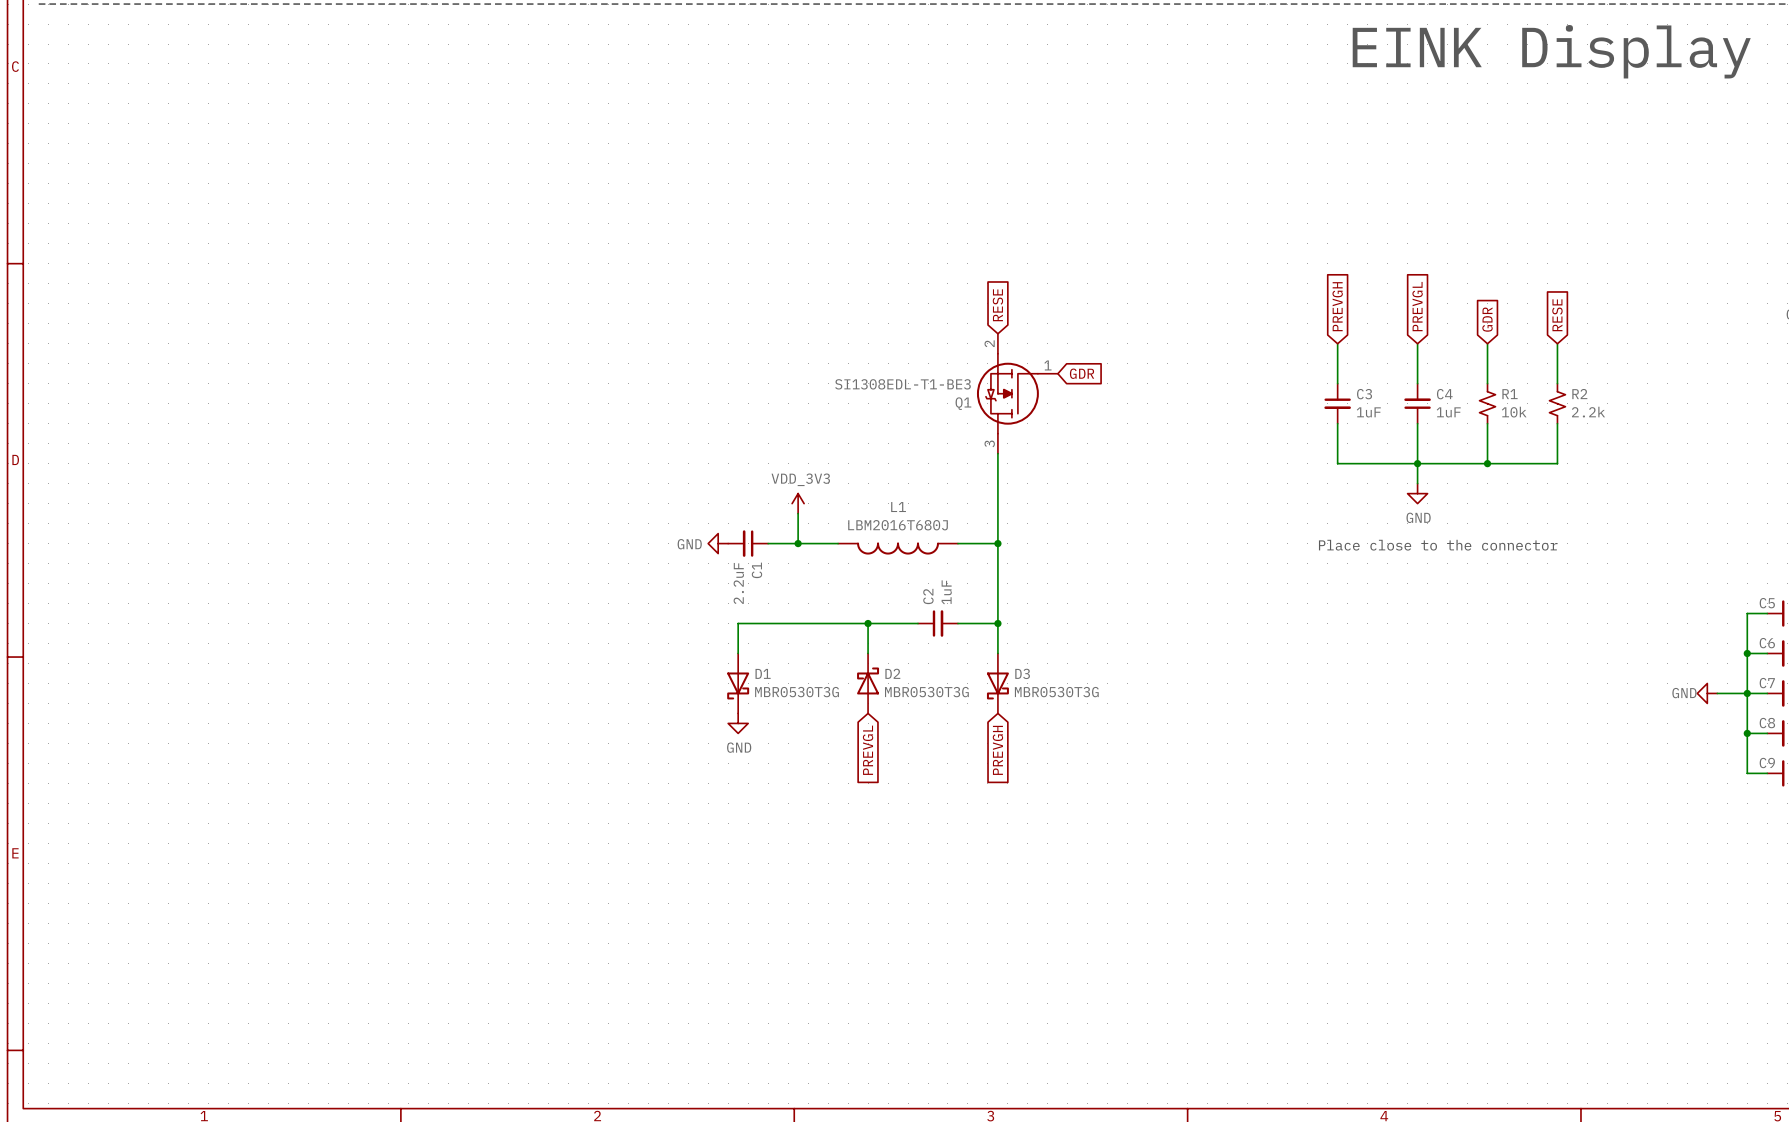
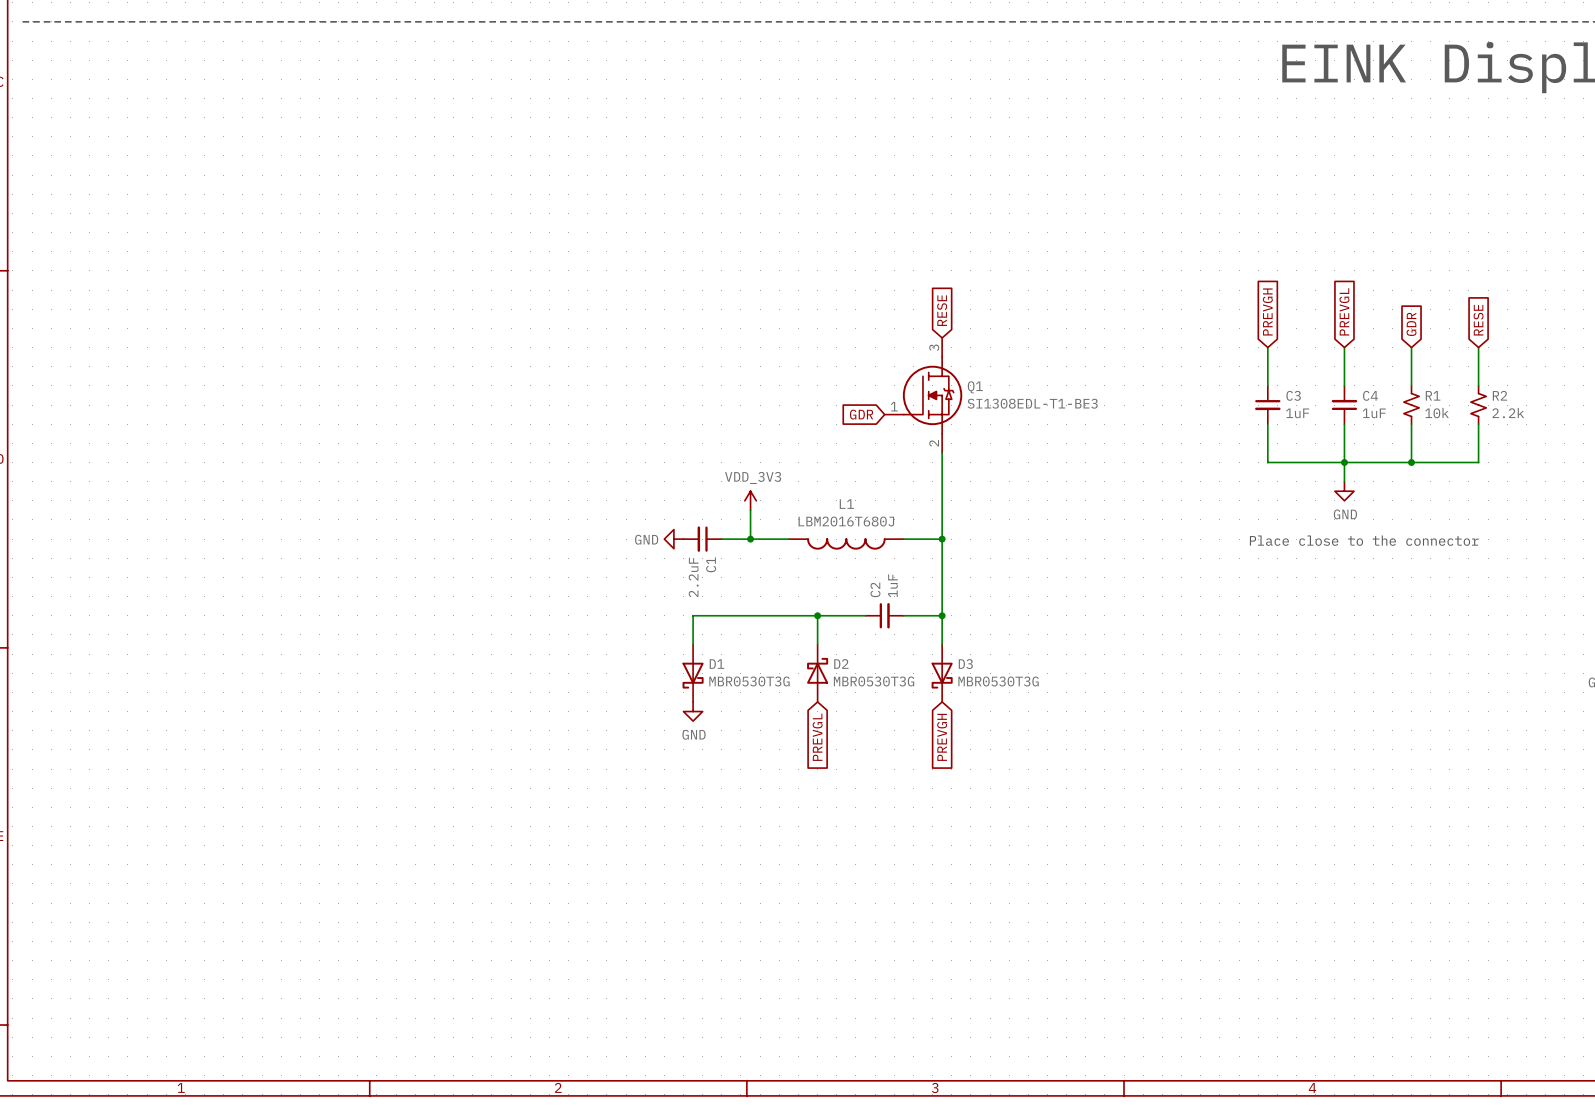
global label rotation: 0° (1082, 373) -> 180° (861, 414)
global label position: GDR (1082, 373) -> GDR (861, 414)
Q1 rotation: 0° (1007, 393) -> 180° (932, 395)

